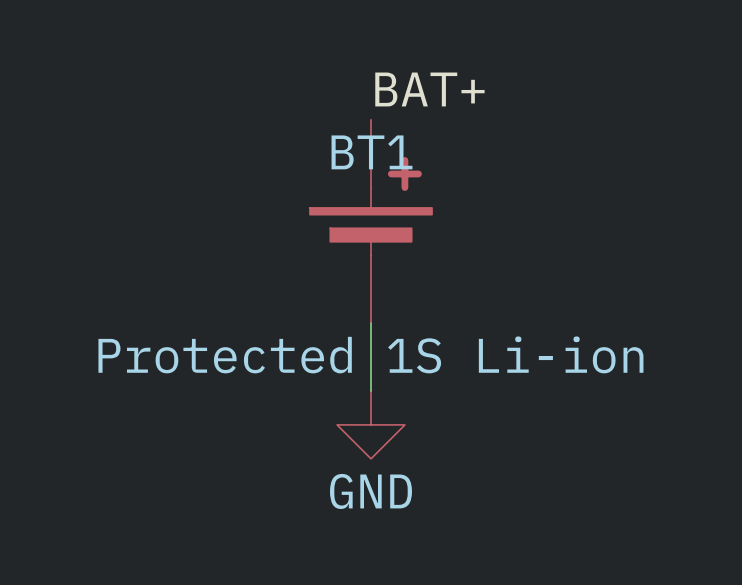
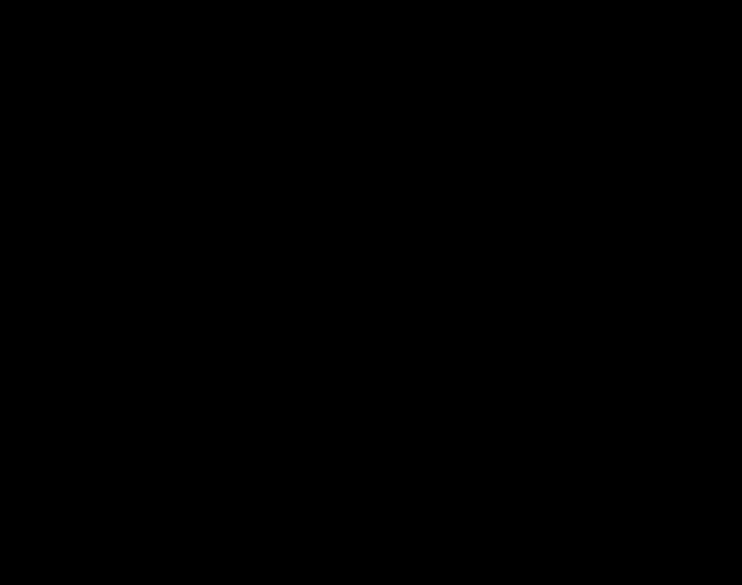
label: BAT+ (429, 89) -> none
BT1: Protected 1S Li-ion (371, 221) -> none
wire: (371, 323) (371, 391) -> none
power symbol: GND (371, 424) -> none

